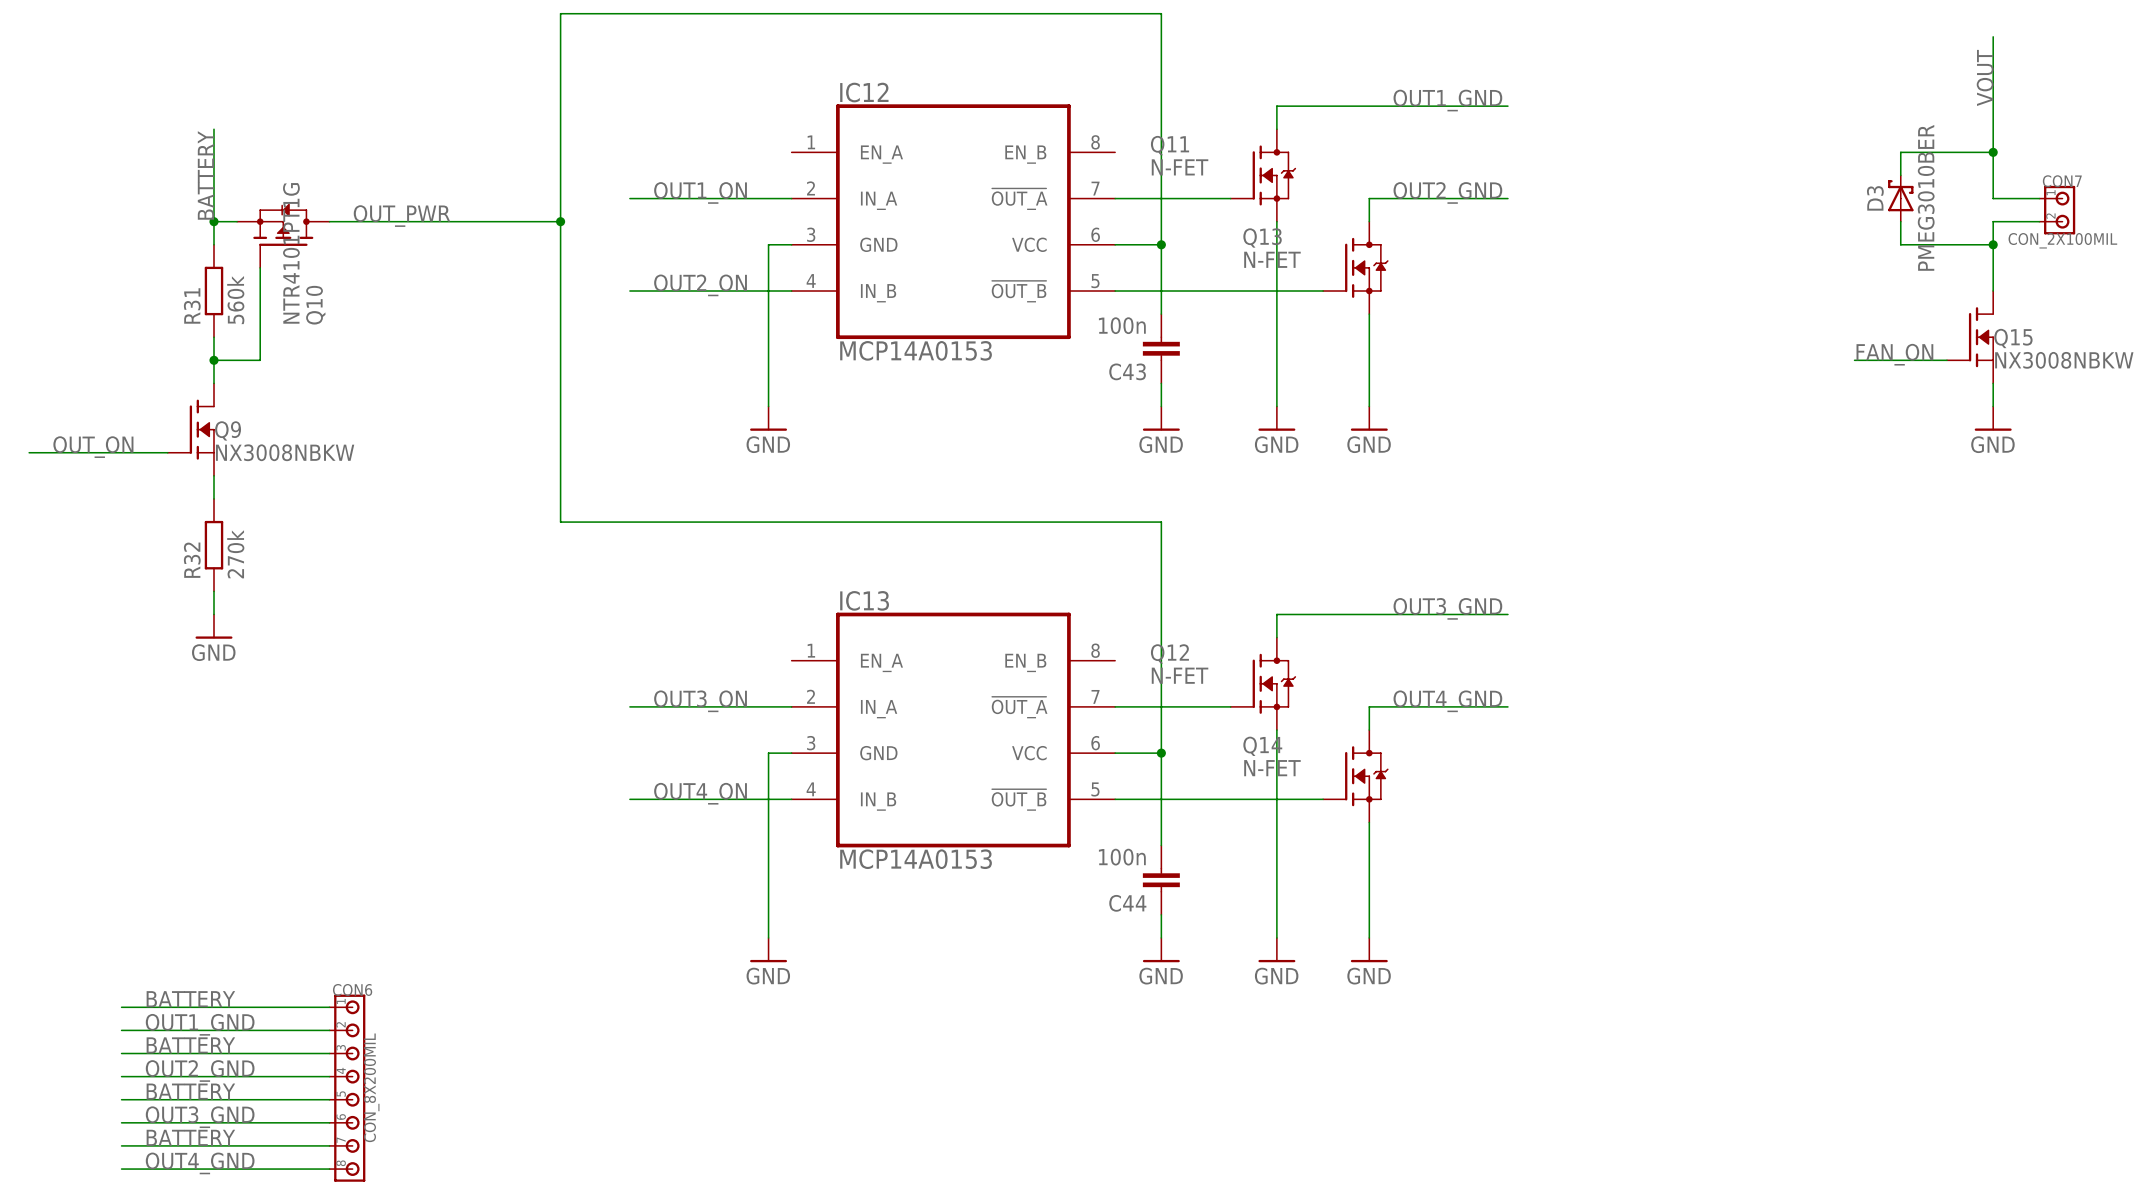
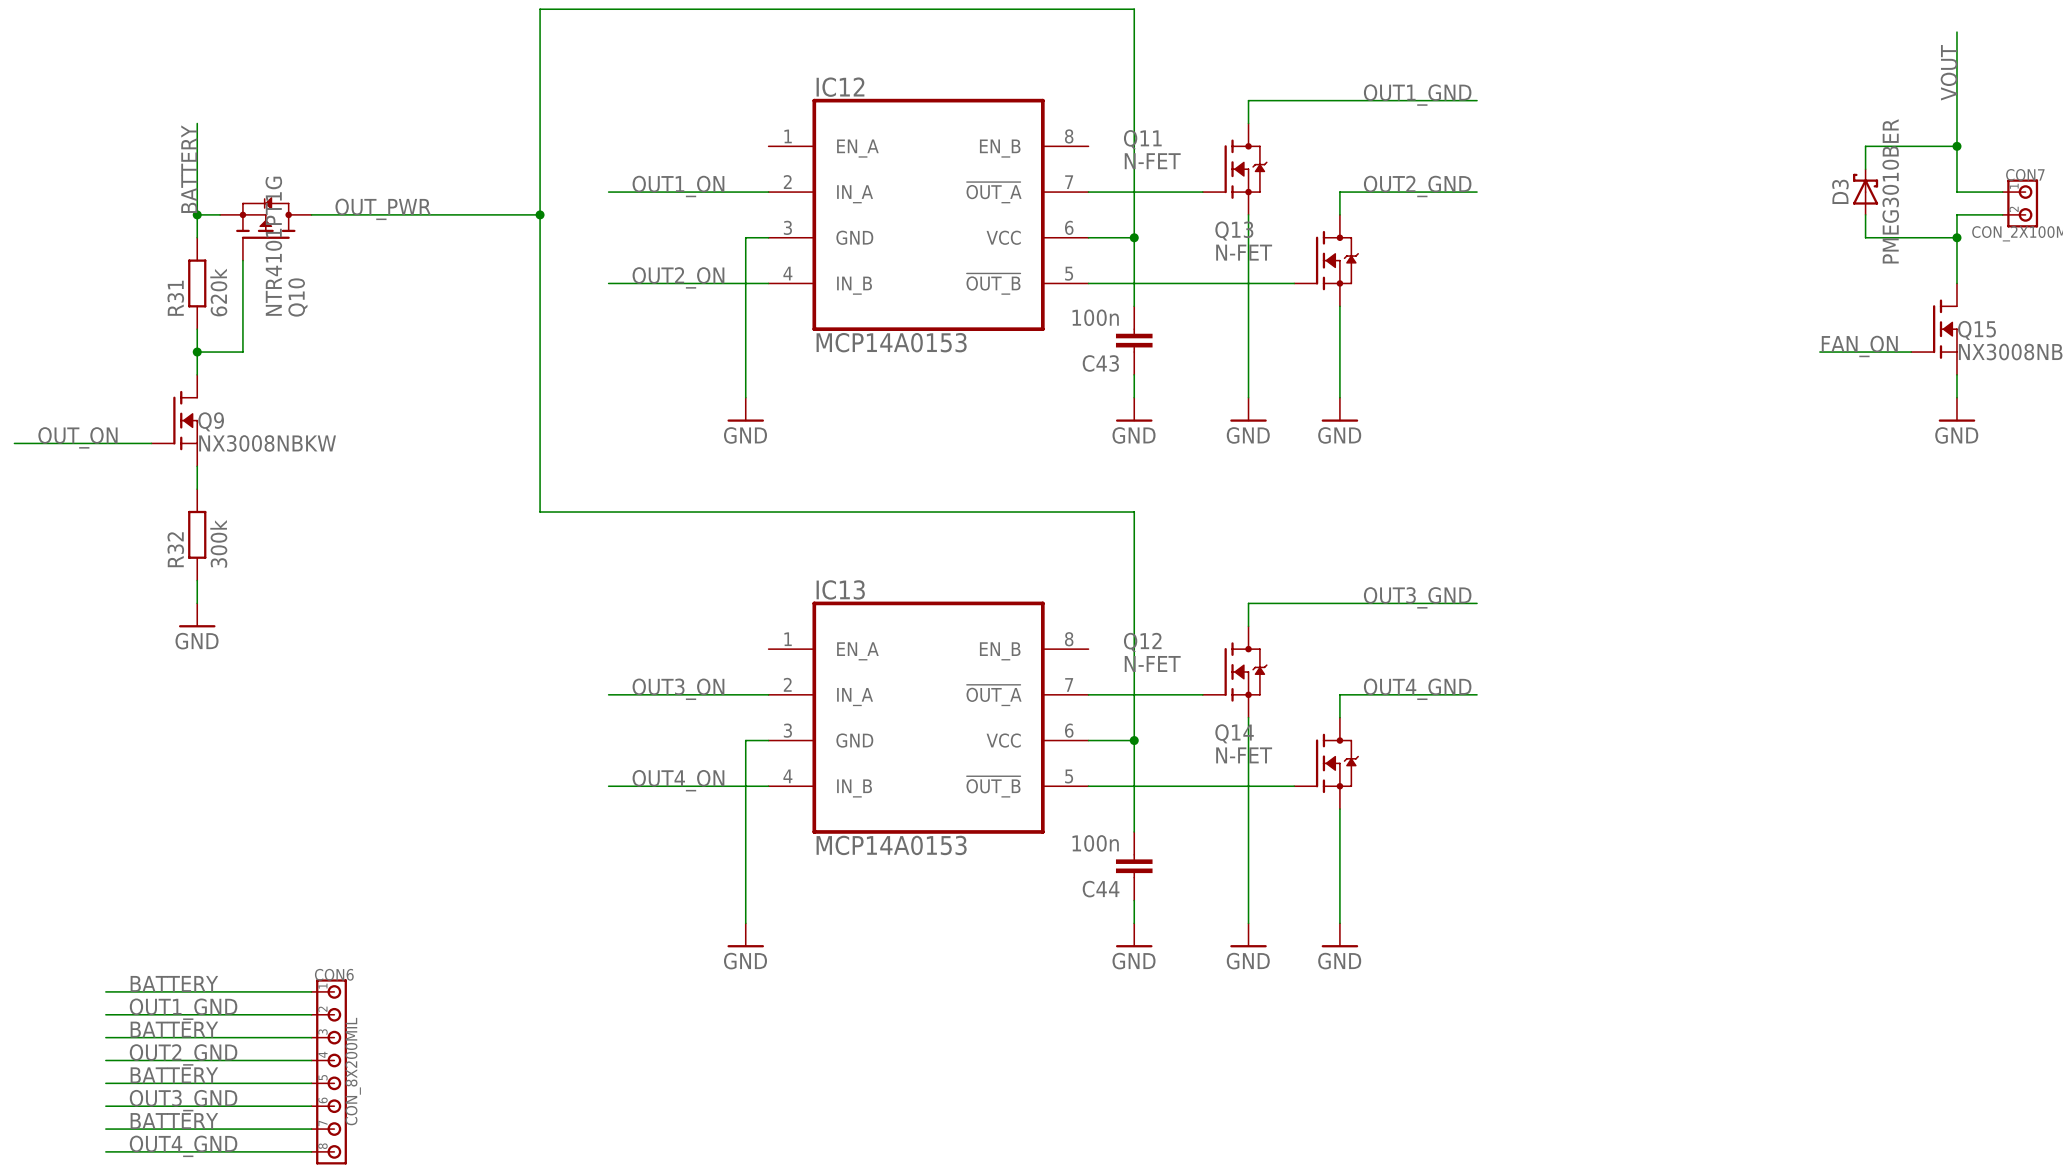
R31 value: 560k (235, 300) -> 620k (218, 292)
R32 value: 270k (235, 554) -> 300k (218, 543)

